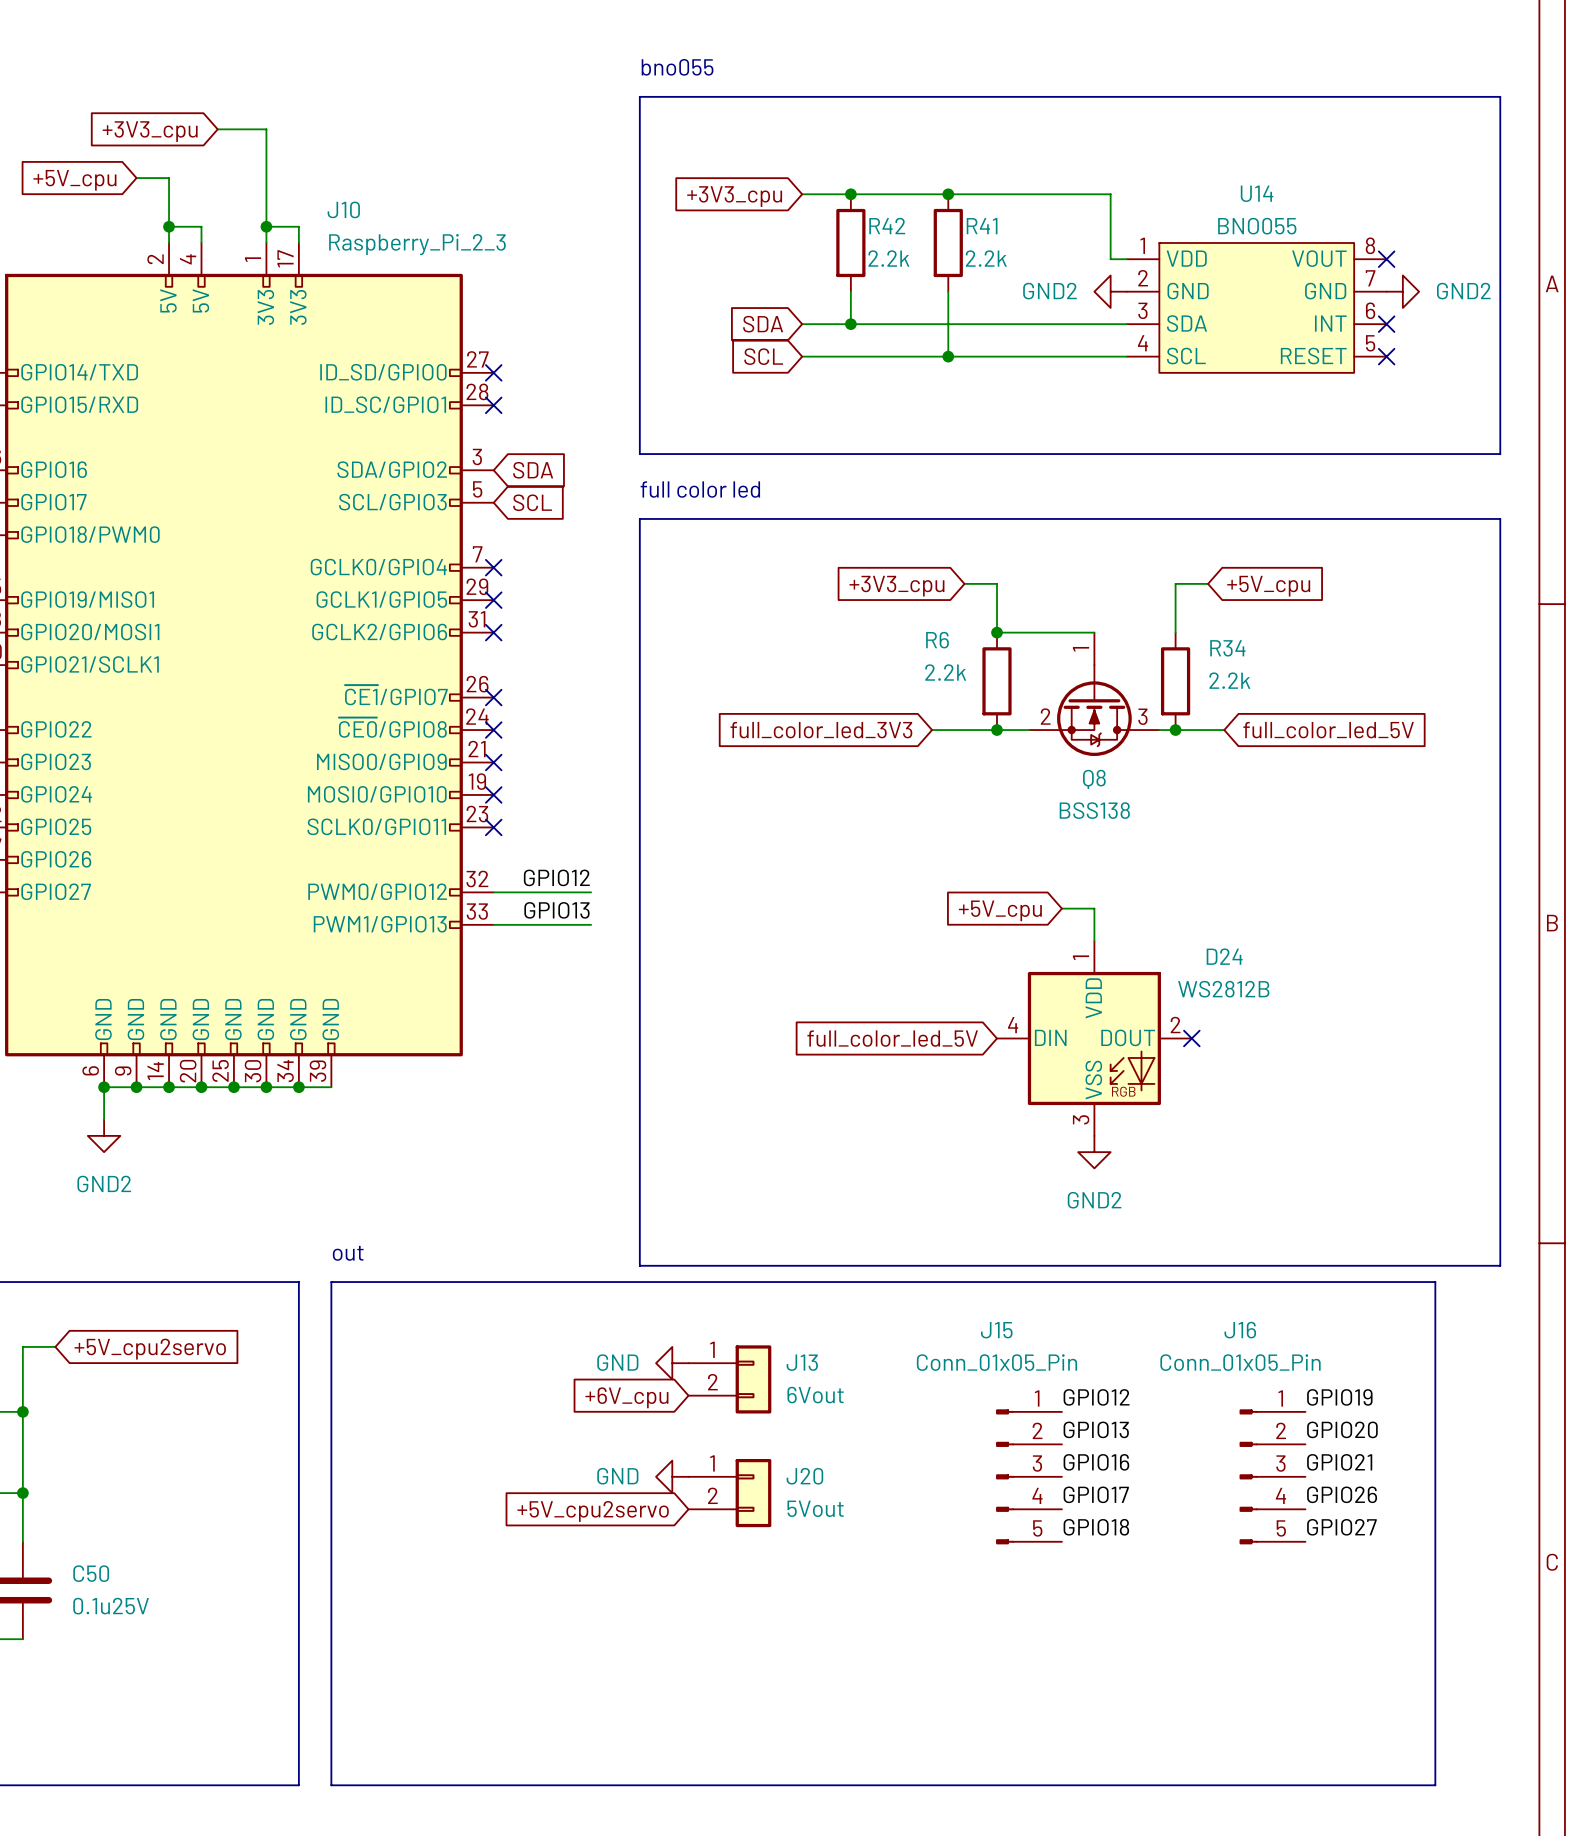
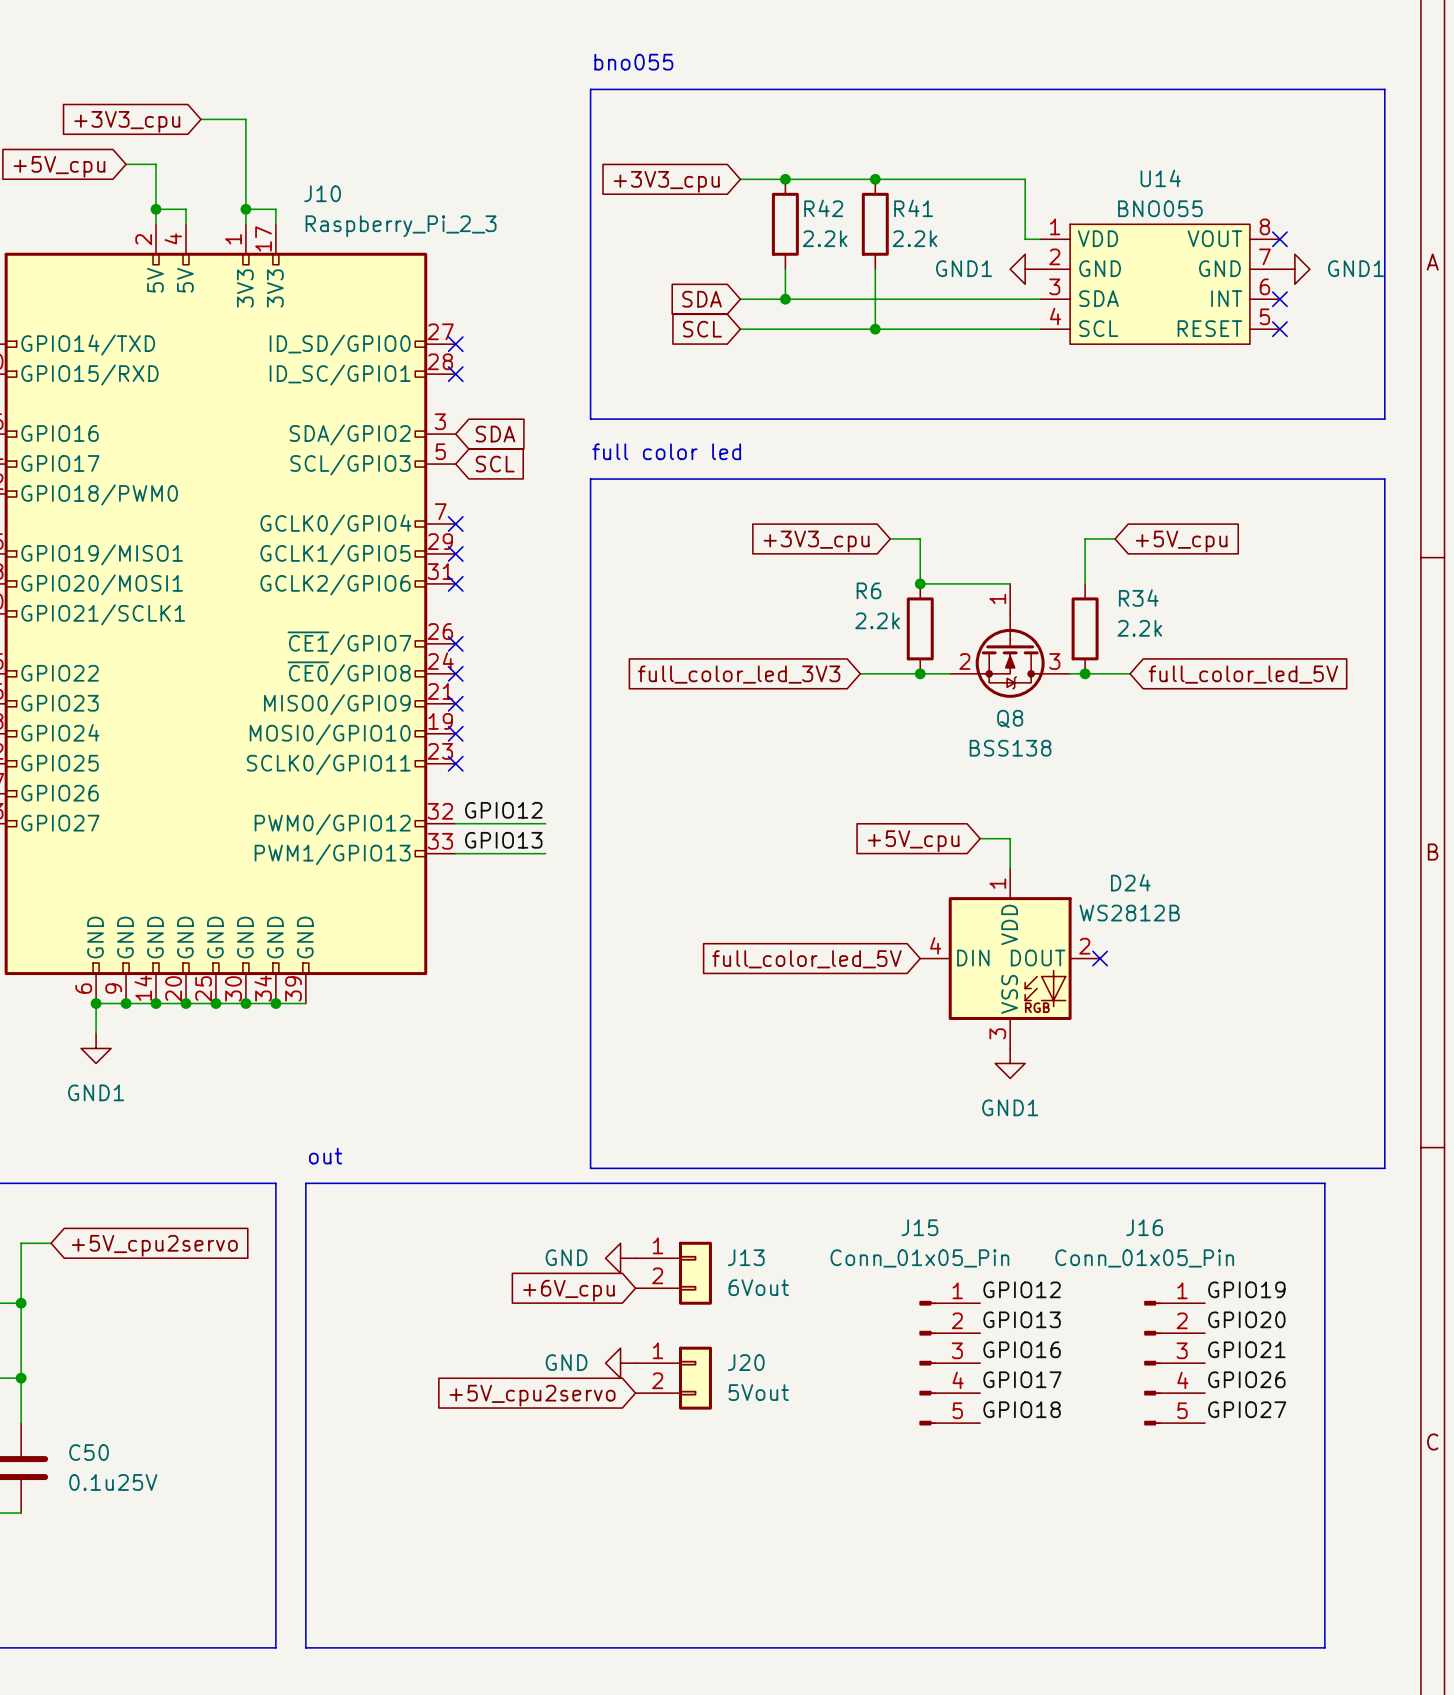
power symbol: GND2 (1110, 291) -> GND1 (1025, 269)
power symbol: GND2 (1402, 291) -> GND1 (1294, 269)
power symbol: GND2 (104, 1135) -> GND1 (96, 1048)
power symbol: GND2 (1094, 1152) -> GND1 (1010, 1063)

